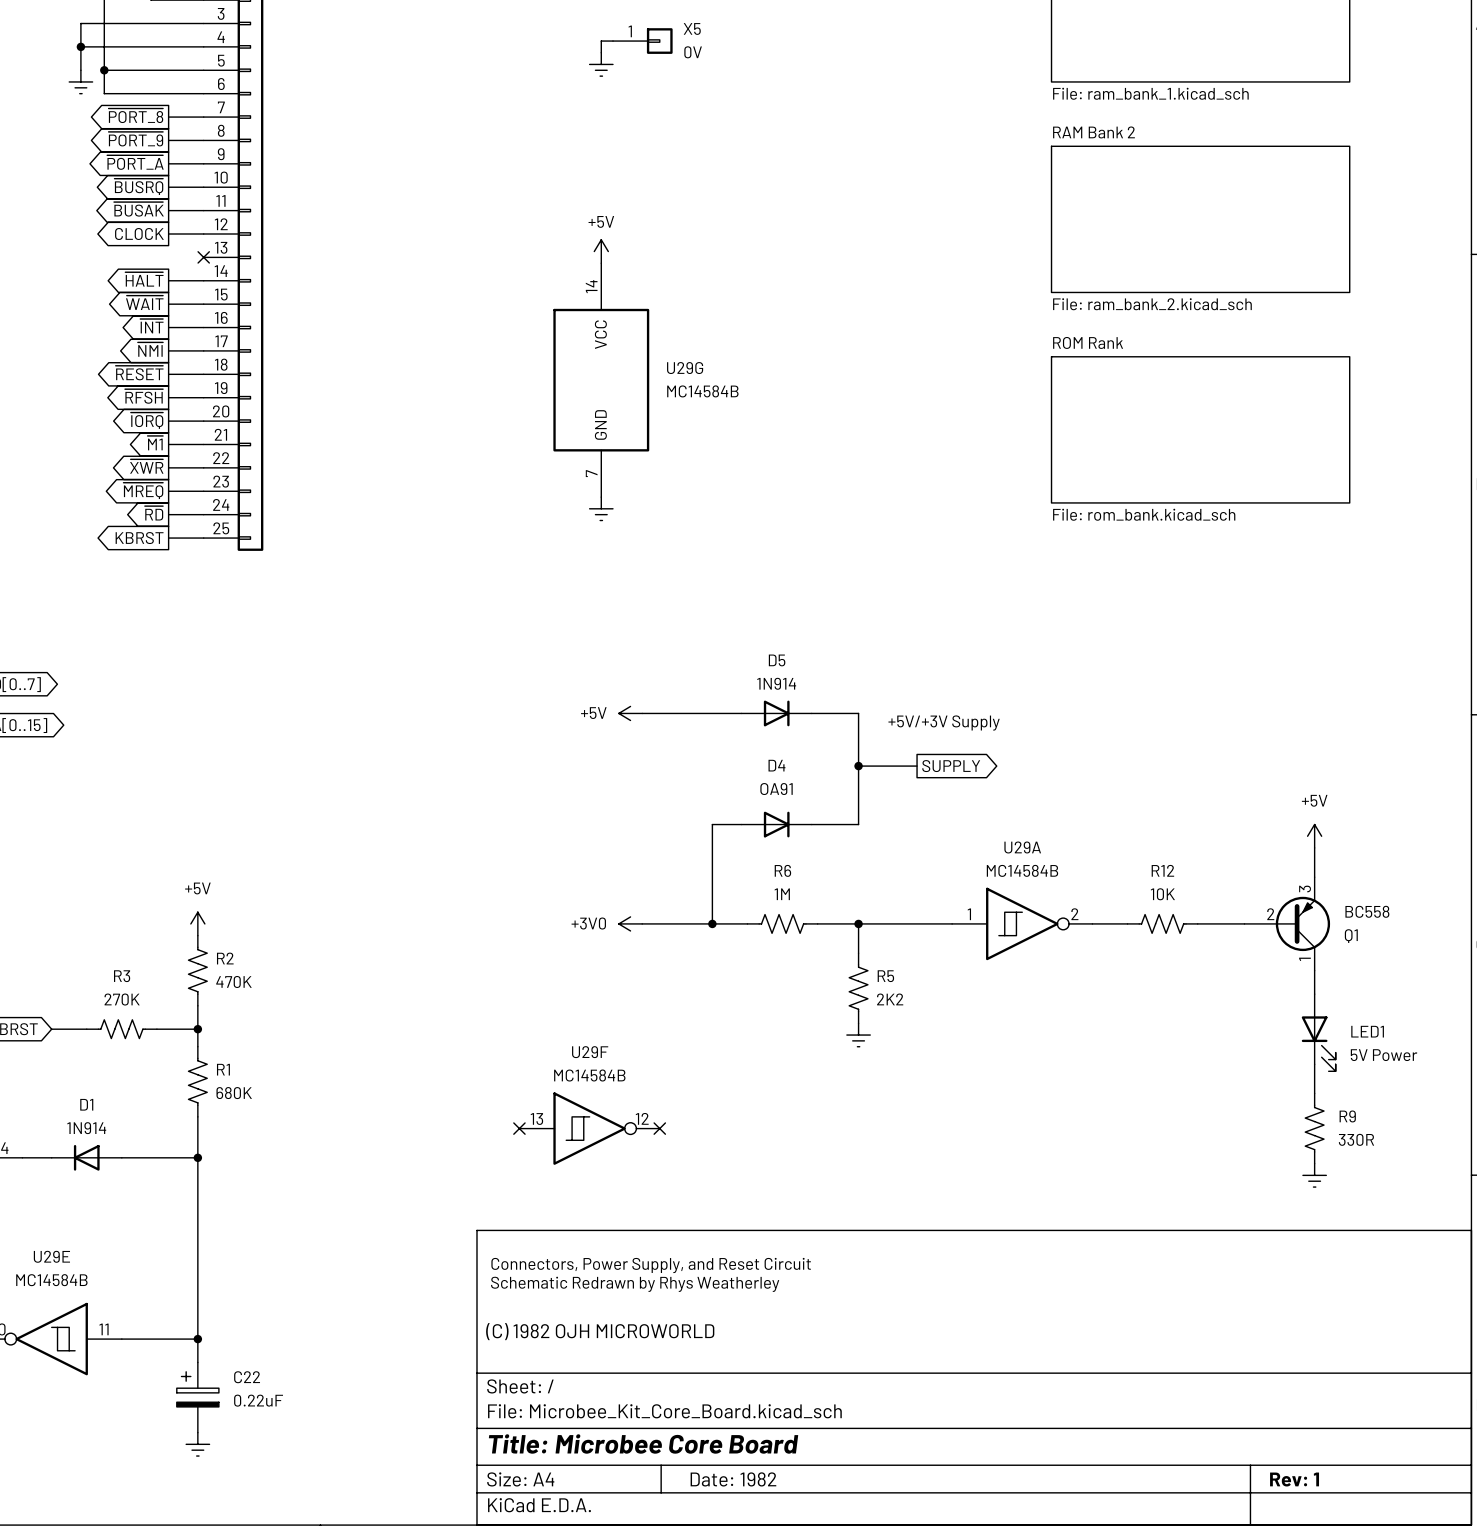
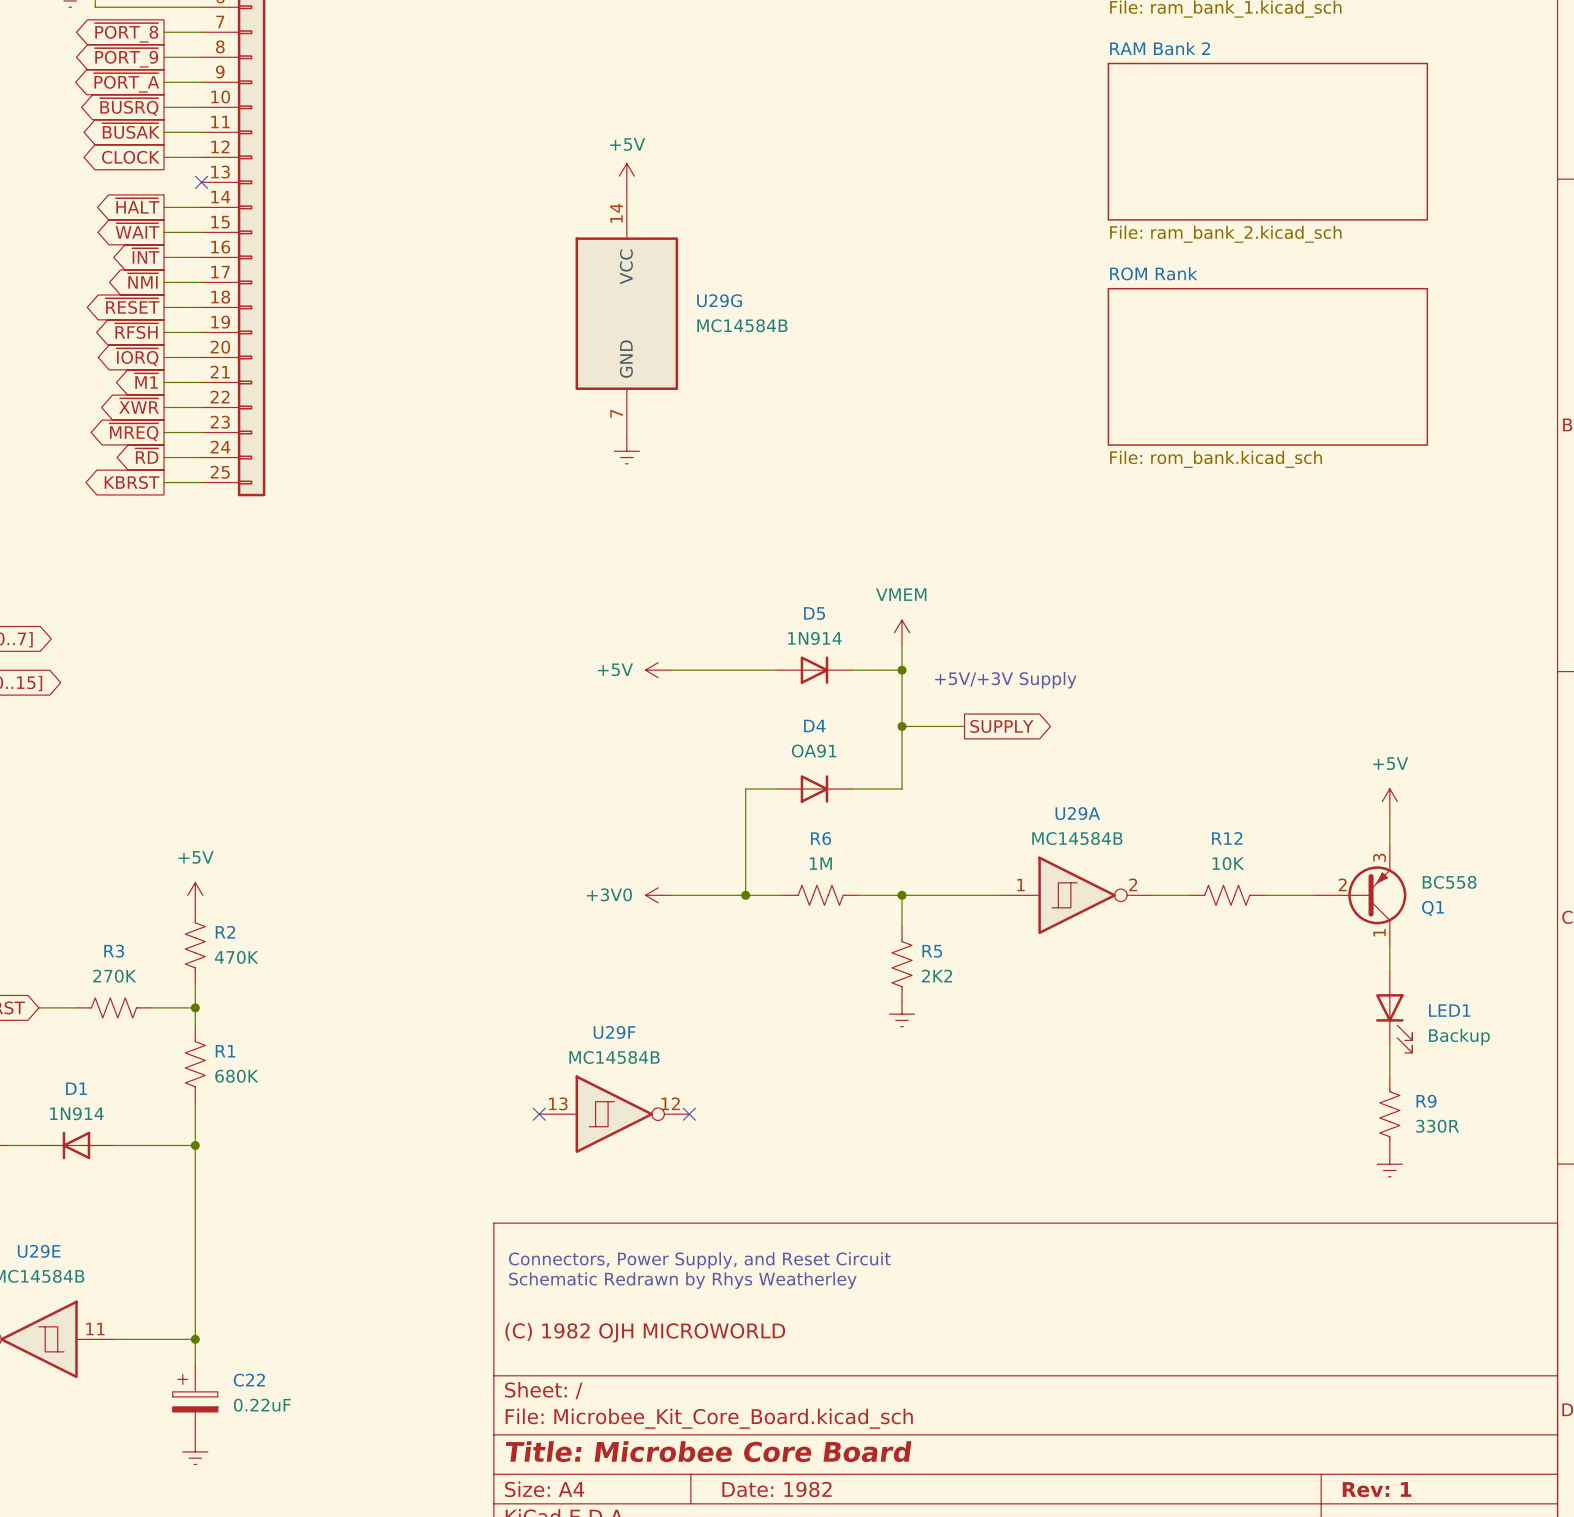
power symbol: none -> VMEM (902, 632)
wire: none -> (902, 645) (902, 670)
junction: none -> (902, 670)
LED1 value: 5V Power (1384, 1055) -> Backup (1459, 1037)

